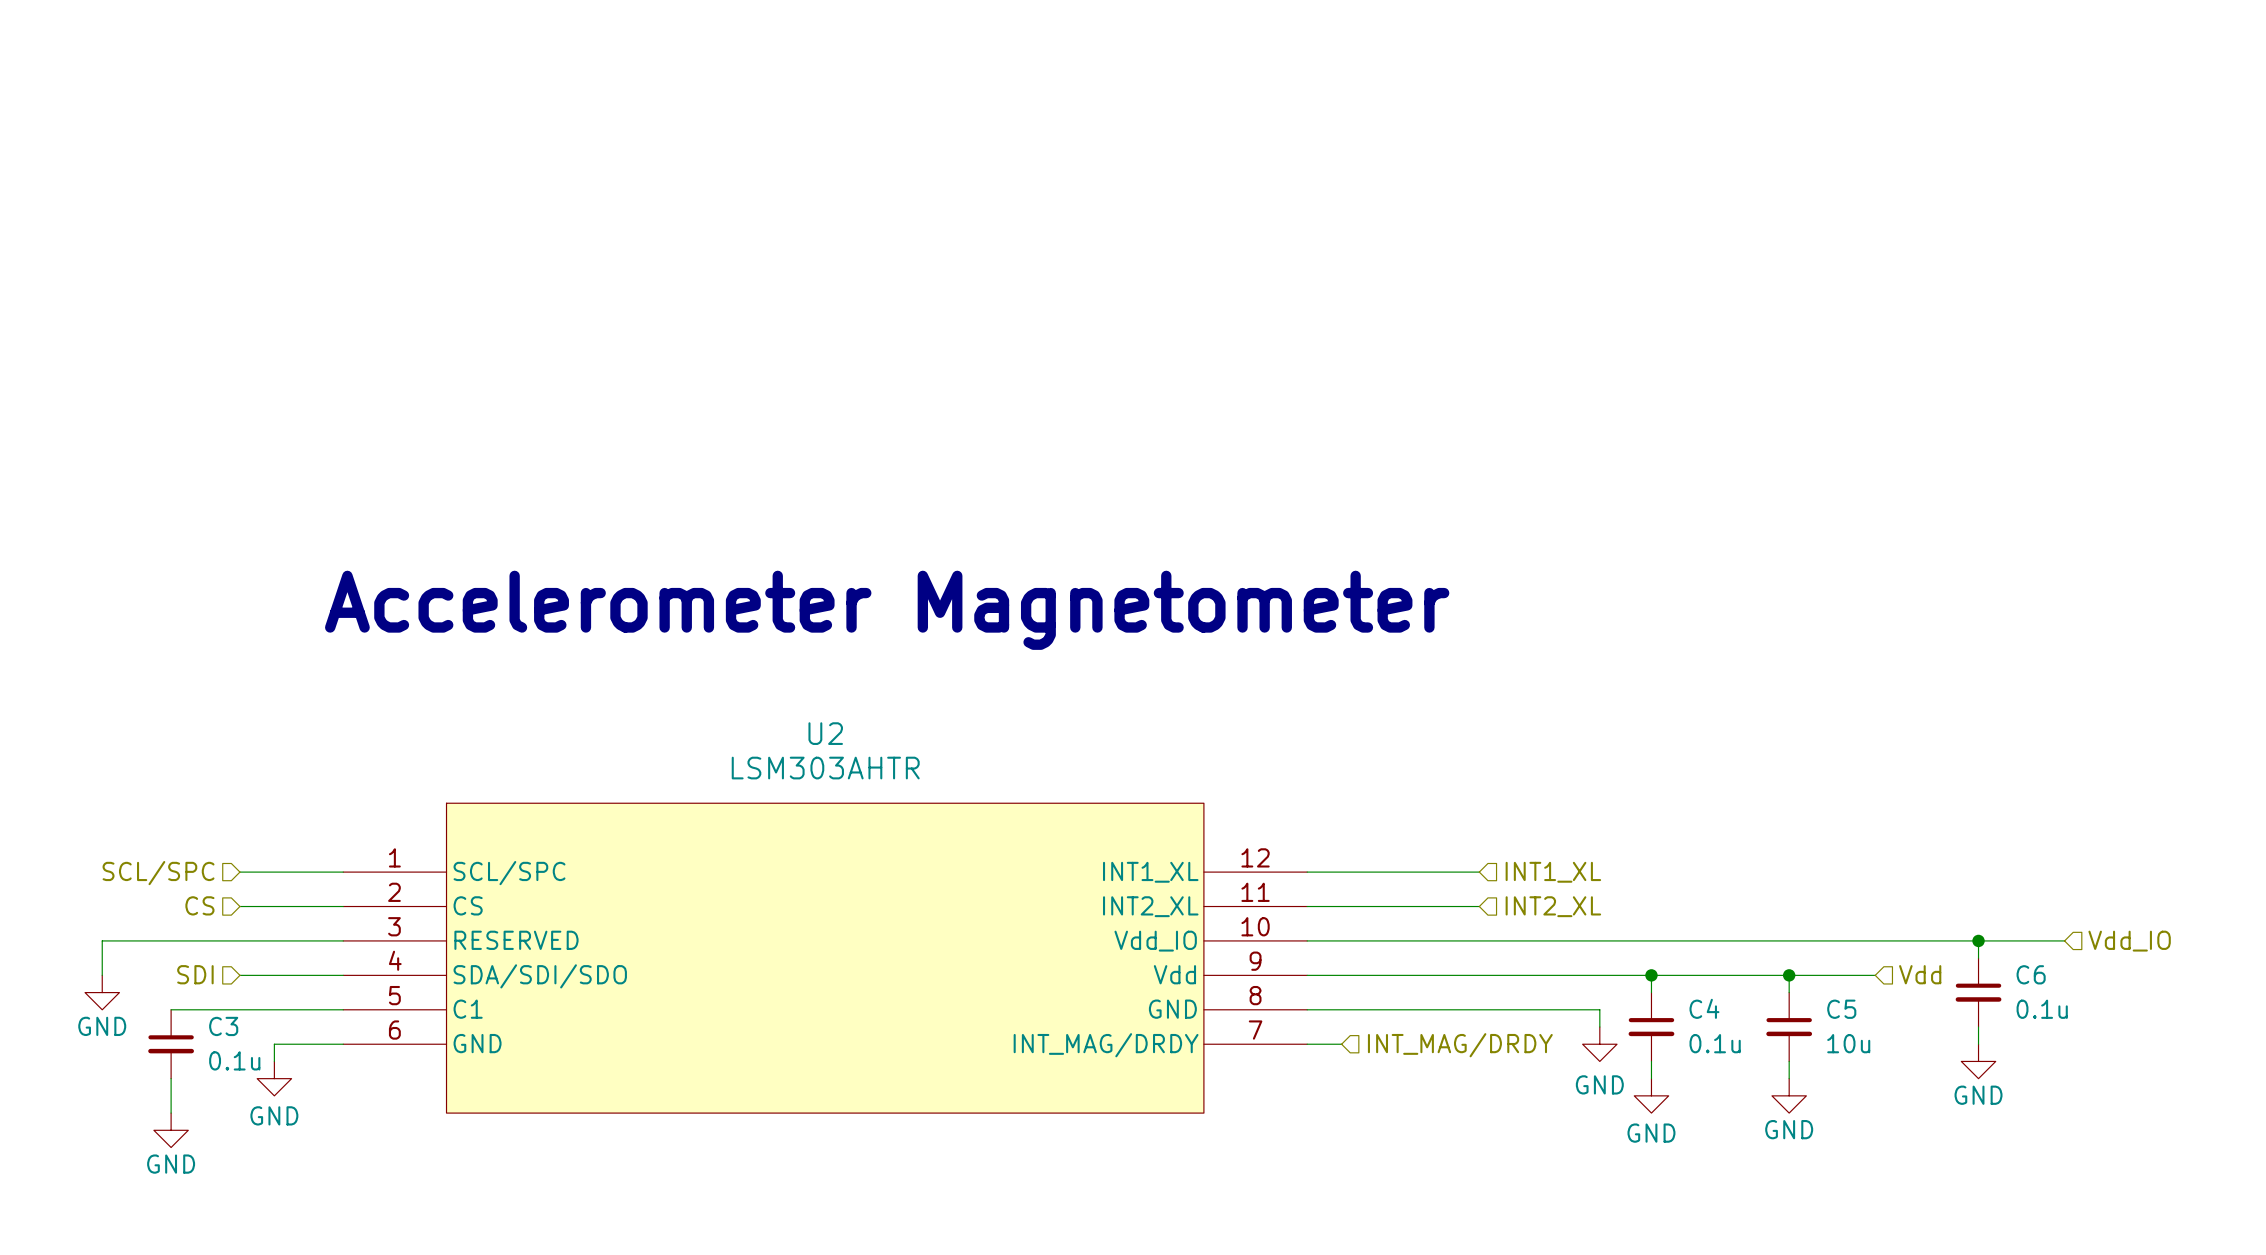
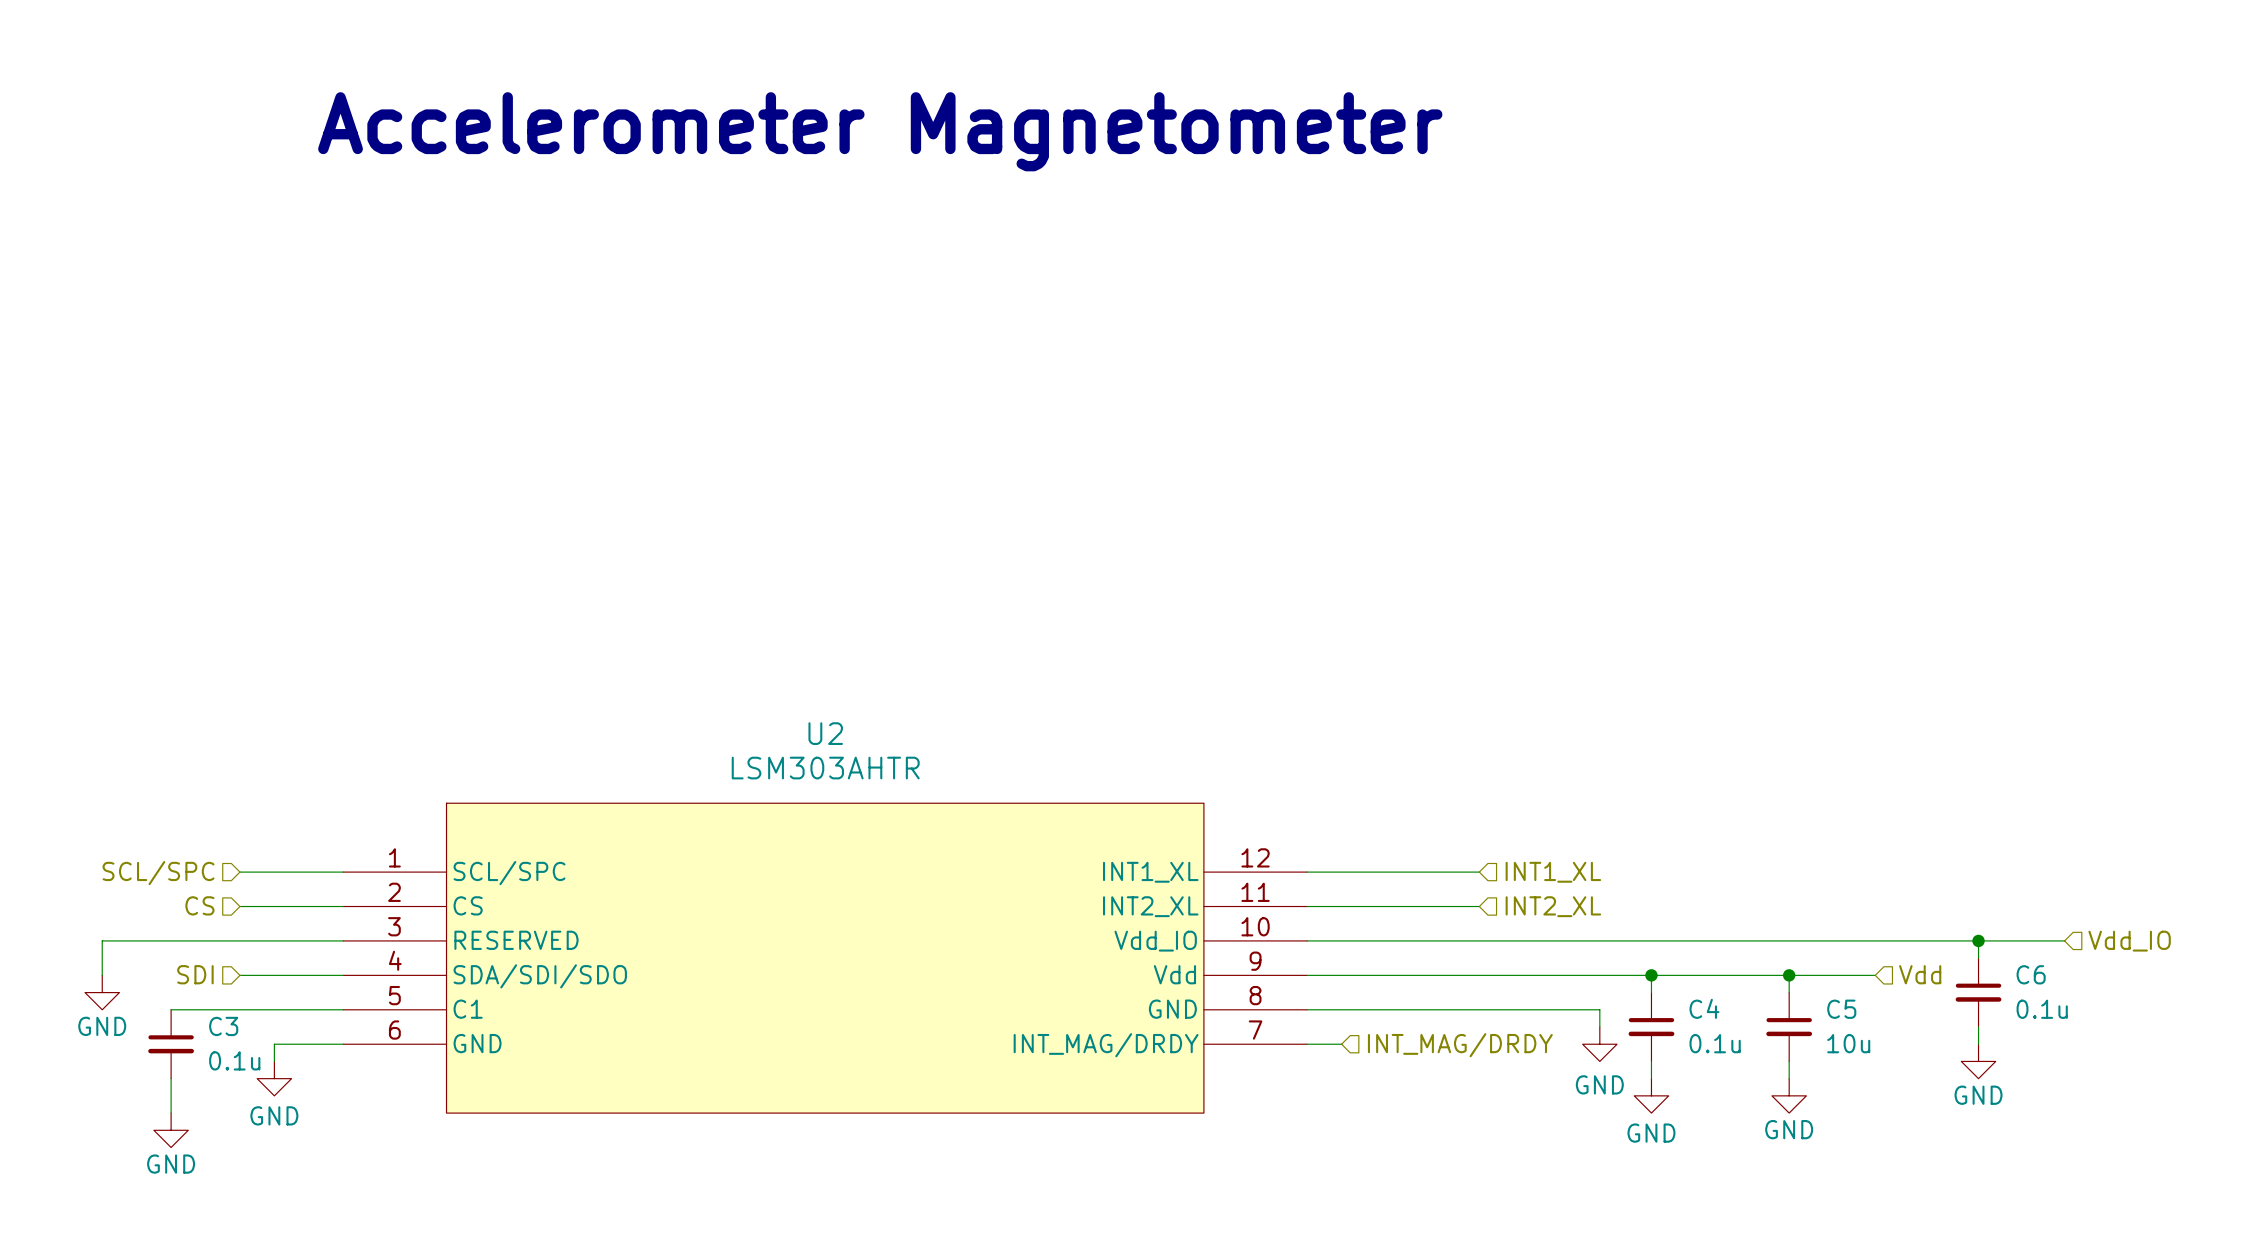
text: none -> Accelerometer Magnetometer (880, 131)
text: Accelerometer Magnetometer (887, 610) -> none

